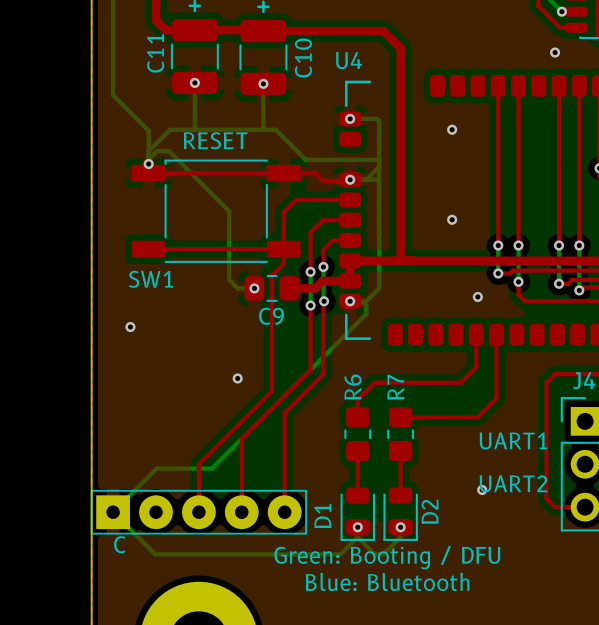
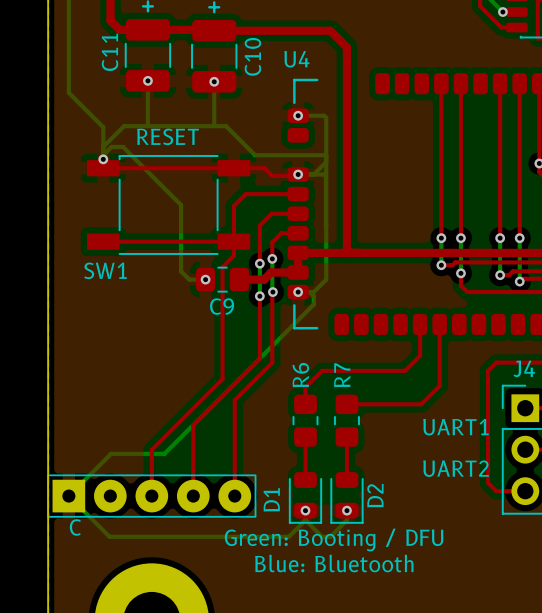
via: (555, 52) -> none
via: (452, 129) -> none
via: (452, 219) -> none
via: (477, 296) -> none
via: (130, 327) -> none
via: (237, 378) -> none
via: (482, 489) -> none

